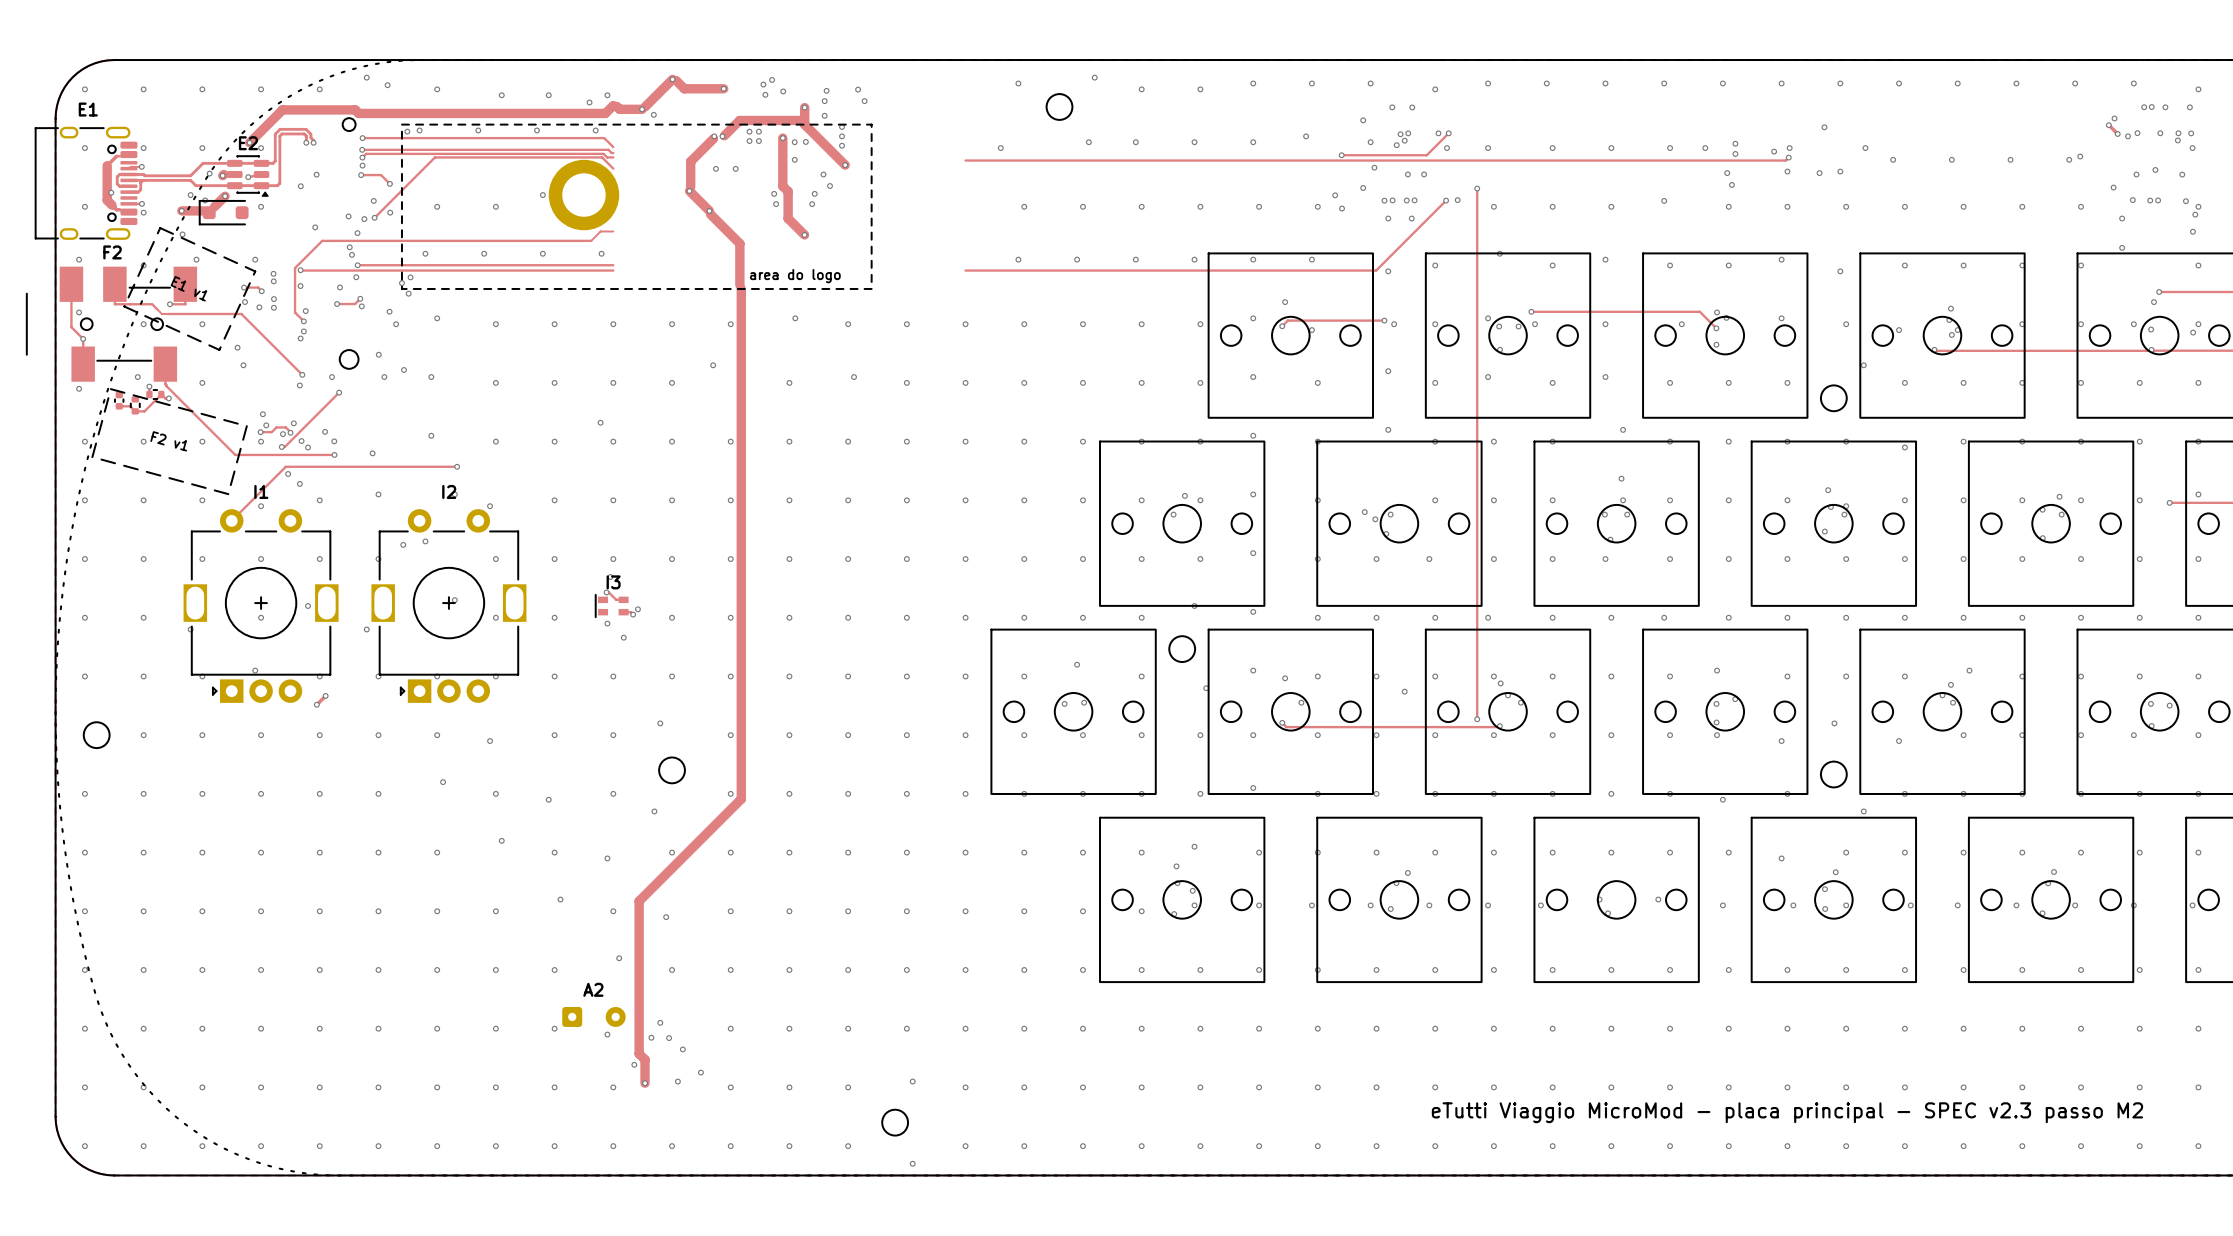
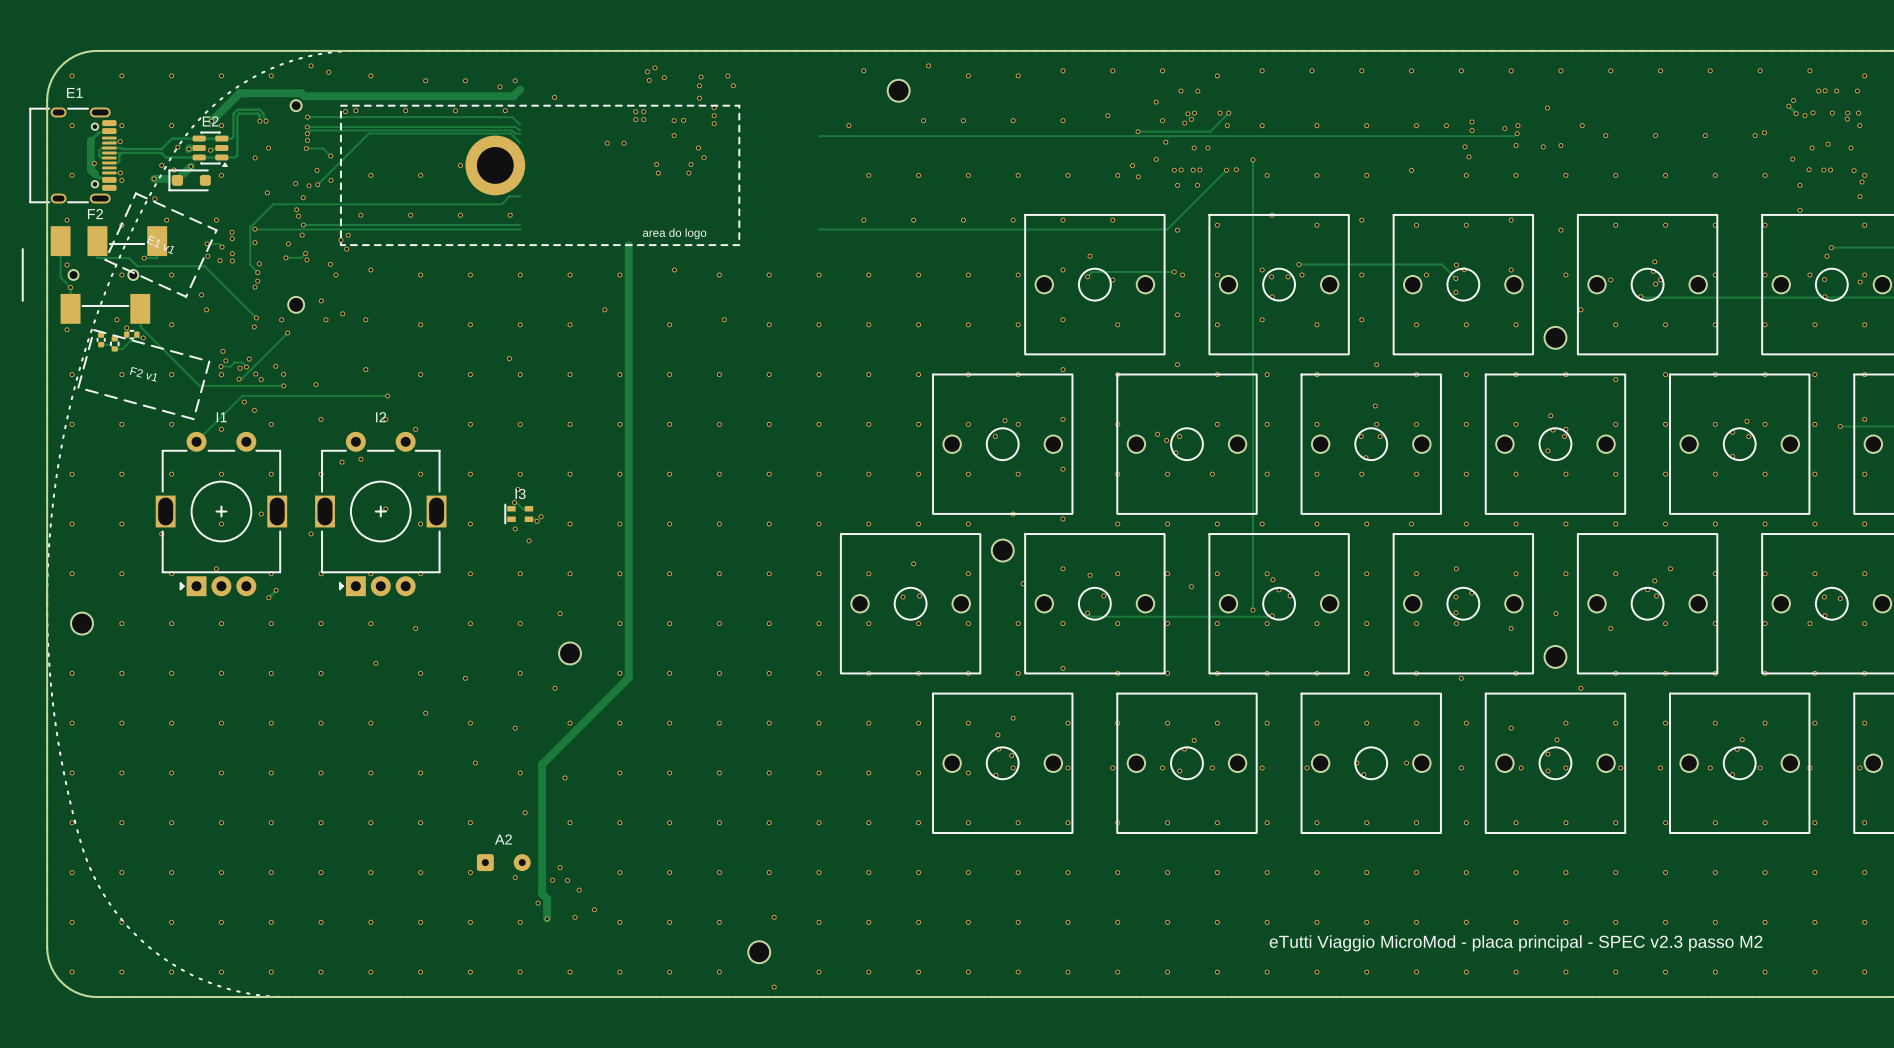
track: (672, 79) (645, 106) -> none
via: (672, 79) -> none
track: (676, 80) (684, 88) (723, 88) -> none
via: (723, 88) -> none
track: (616, 106) (619, 109) (642, 109) -> none
track: (804, 107) (804, 124) (845, 165) -> none
via: (804, 107) -> none
via: (642, 109) -> none
track: (801, 120) (739, 120) (724, 135) -> none
via: (714, 136) -> none
via: (722, 136) -> none
track: (713, 138) (690, 161) (690, 186) -> none
track: (782, 138) (782, 186) (788, 191) (788, 218) (804, 234) -> none
via: (782, 138) -> none
via: (845, 165) -> none
track: (689, 191) (709, 210) -> none
via: (689, 191) -> none
via: (709, 210) -> none
track: (710, 214) (739, 243) (739, 284) -> none
via: (804, 234) -> none

